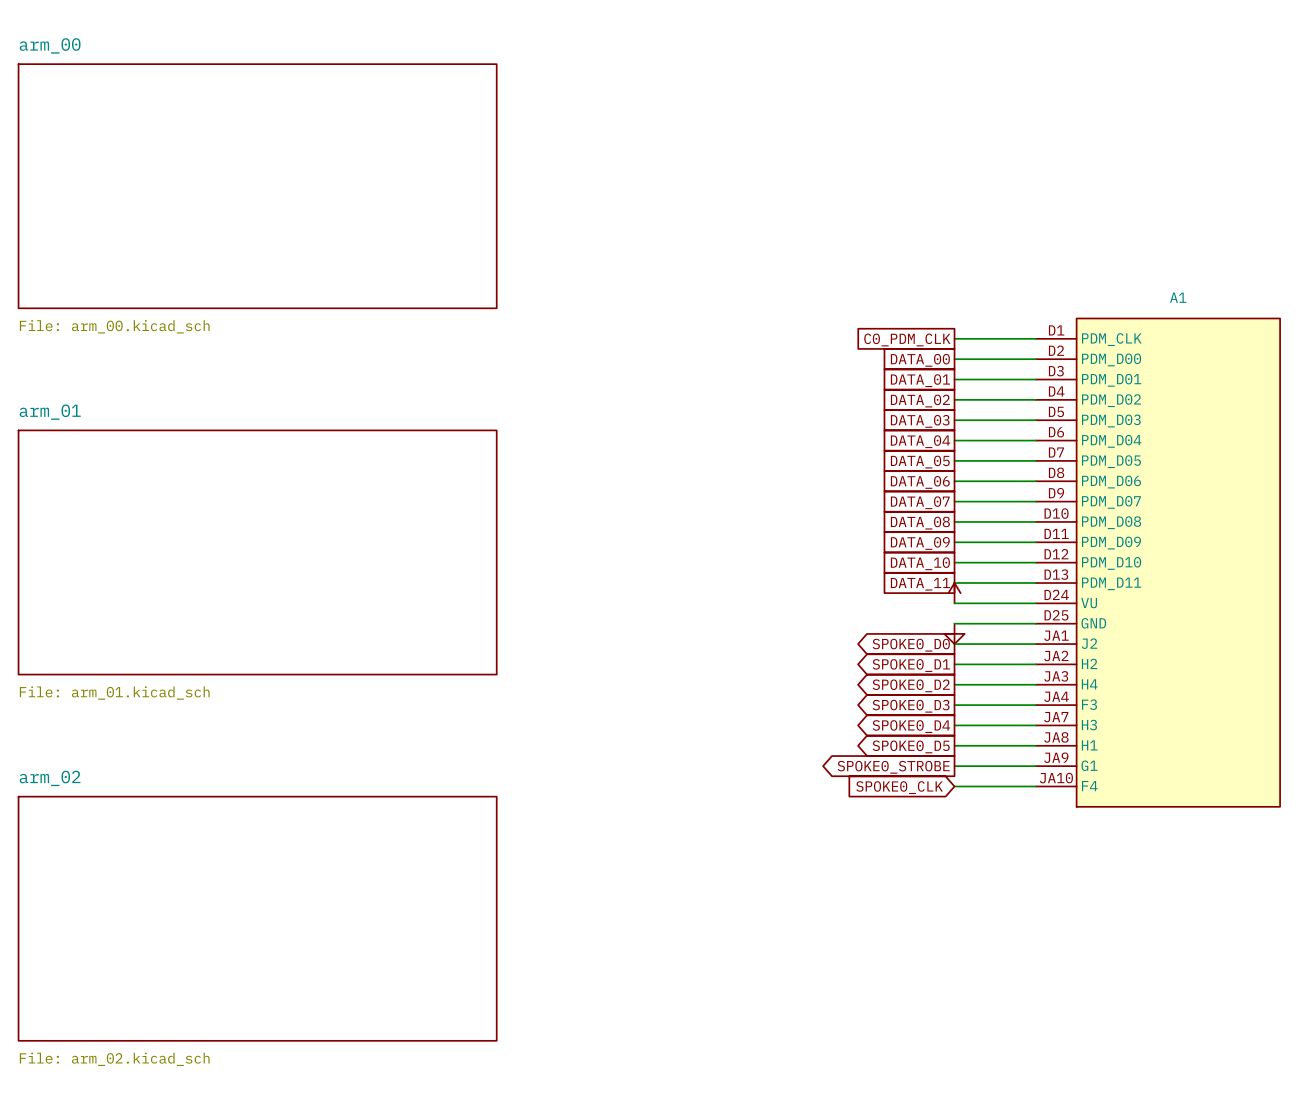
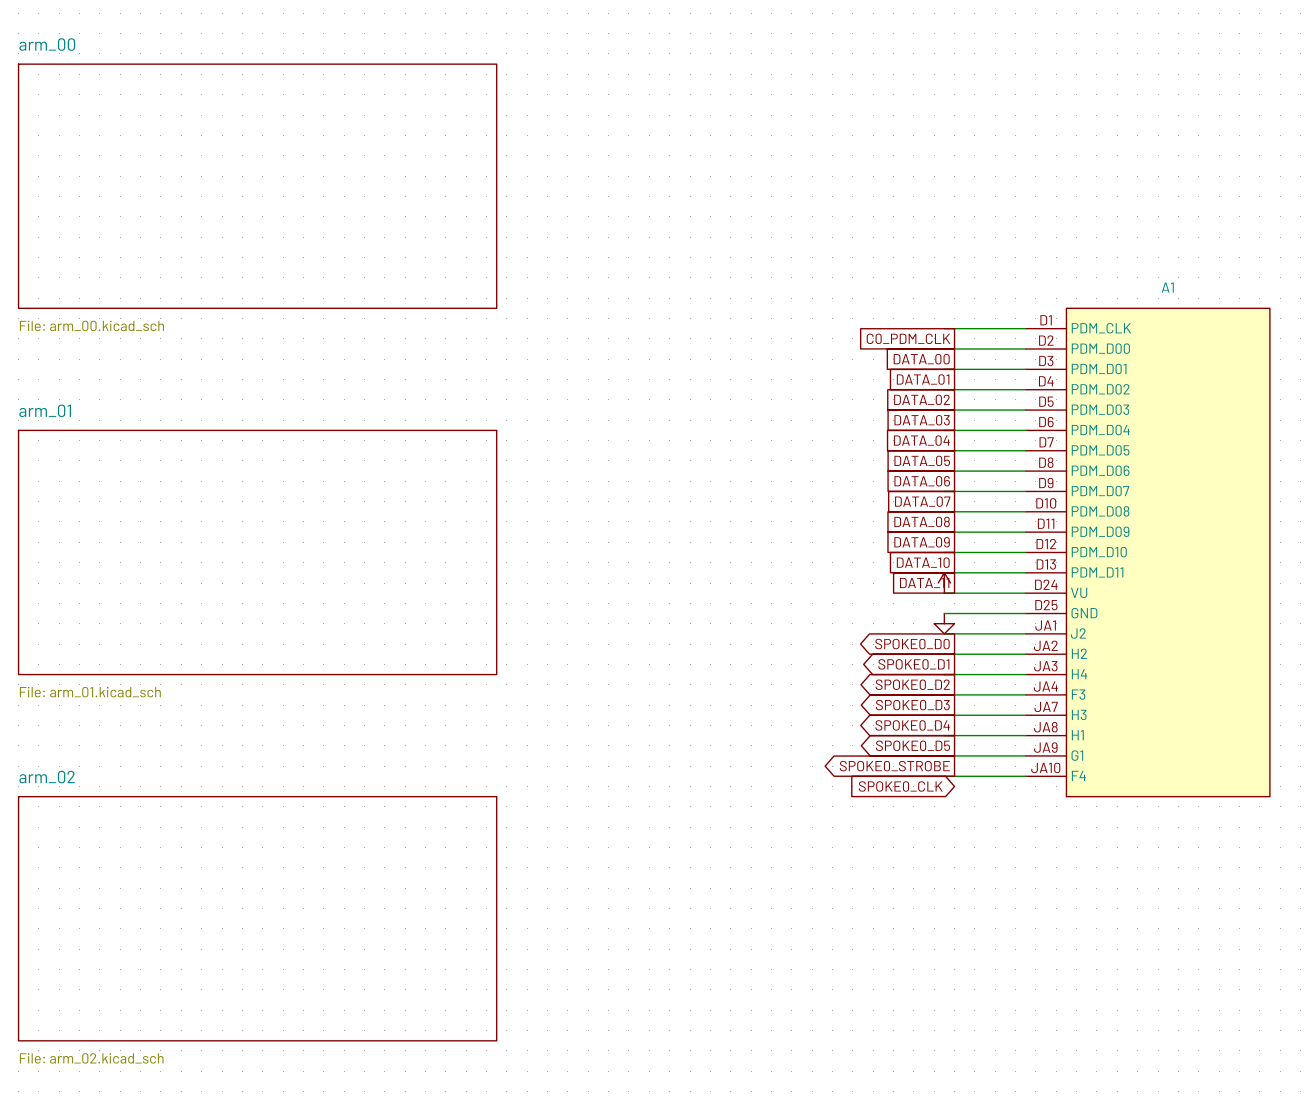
wire: (954, 338) (1035, 338) -> (944, 328) (1025, 328)
wire: (954, 359) (1035, 359) -> (944, 349) (1025, 349)
wire: (954, 379) (1035, 379) -> (944, 369) (1025, 369)
wire: (954, 399) (1035, 399) -> (944, 389) (1025, 389)
wire: (954, 420) (1035, 420) -> (944, 410) (1025, 410)
wire: (954, 440) (1035, 440) -> (944, 430) (1025, 430)
wire: (954, 460) (1035, 460) -> (944, 450) (1025, 450)
wire: (954, 481) (1035, 481) -> (944, 471) (1025, 471)
wire: (954, 501) (1035, 501) -> (944, 491) (1025, 491)
wire: (954, 521) (1035, 521) -> (944, 511) (1025, 511)
wire: (954, 542) (1035, 542) -> (944, 532) (1025, 532)
wire: (954, 562) (1035, 562) -> (944, 552) (1025, 552)
A1 position: (1158, 562) -> (1147, 552)
wire: (954, 583) (1035, 583) -> (944, 572) (1025, 572)
power symbol position: (954, 593) -> (944, 583)
wire: (954, 603) (1035, 603) -> (944, 593) (1025, 593)
wire: (954, 623) (1035, 623) -> (944, 613) (1025, 613)
power symbol position: (954, 633) -> (944, 623)
wire: (954, 644) (1035, 644) -> (944, 633) (1025, 633)
wire: (954, 664) (1035, 664) -> (944, 654) (1025, 654)
wire: (954, 684) (1035, 684) -> (944, 674) (1025, 674)
wire: (954, 705) (1035, 705) -> (944, 694) (1025, 694)
wire: (954, 725) (1035, 725) -> (944, 715) (1025, 715)
wire: (954, 745) (1035, 745) -> (944, 735) (1025, 735)
wire: (954, 766) (1035, 766) -> (944, 755) (1025, 755)
wire: (954, 786) (1035, 786) -> (944, 776) (1025, 776)

